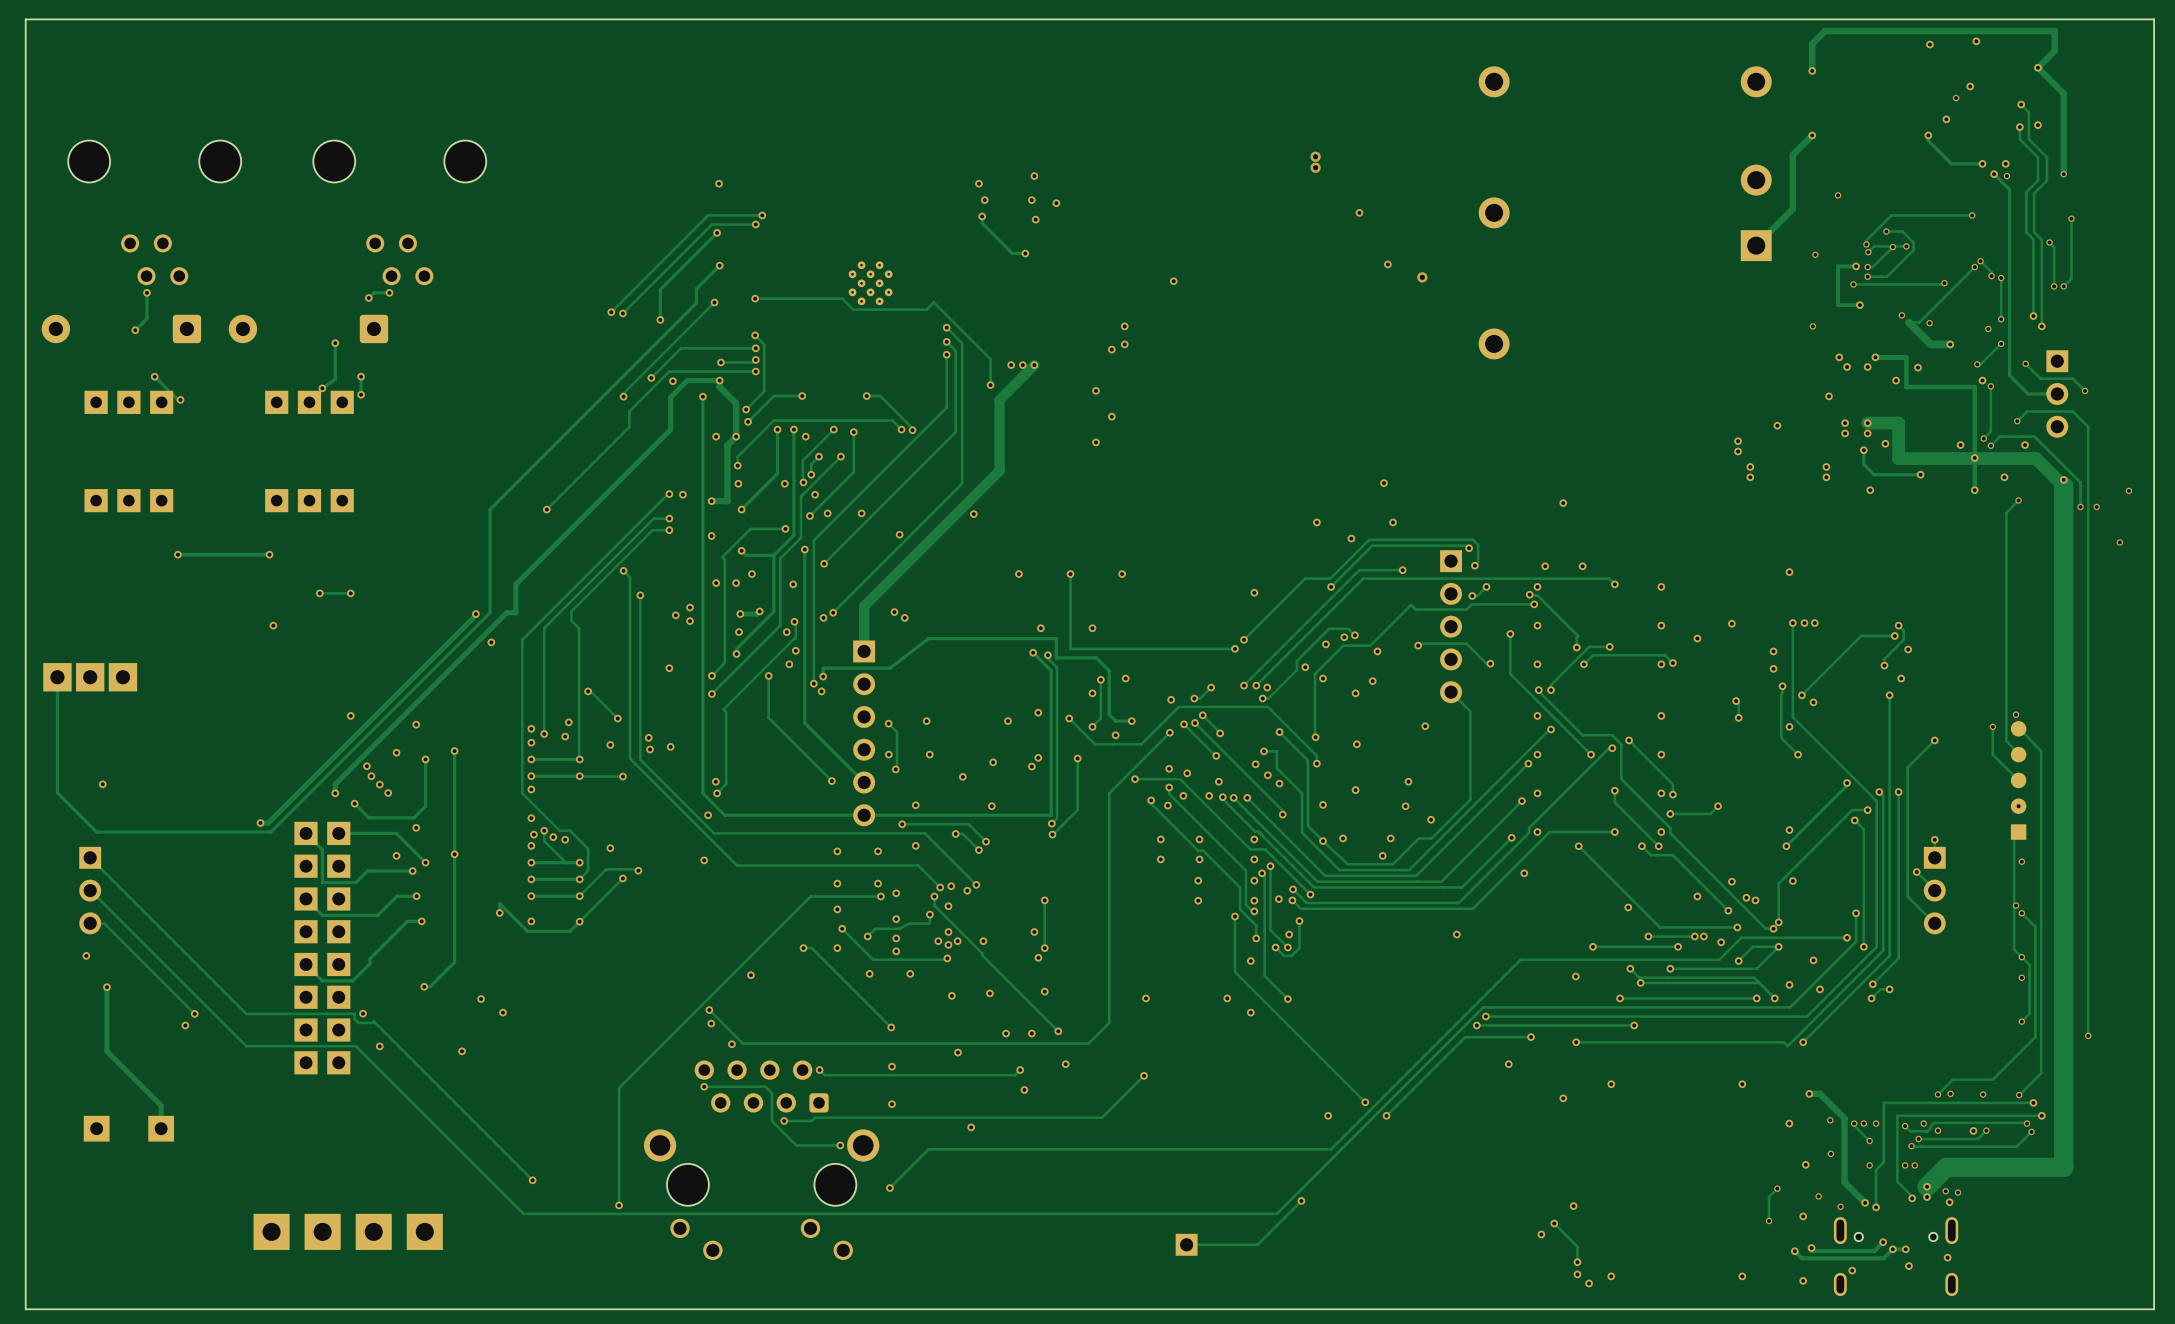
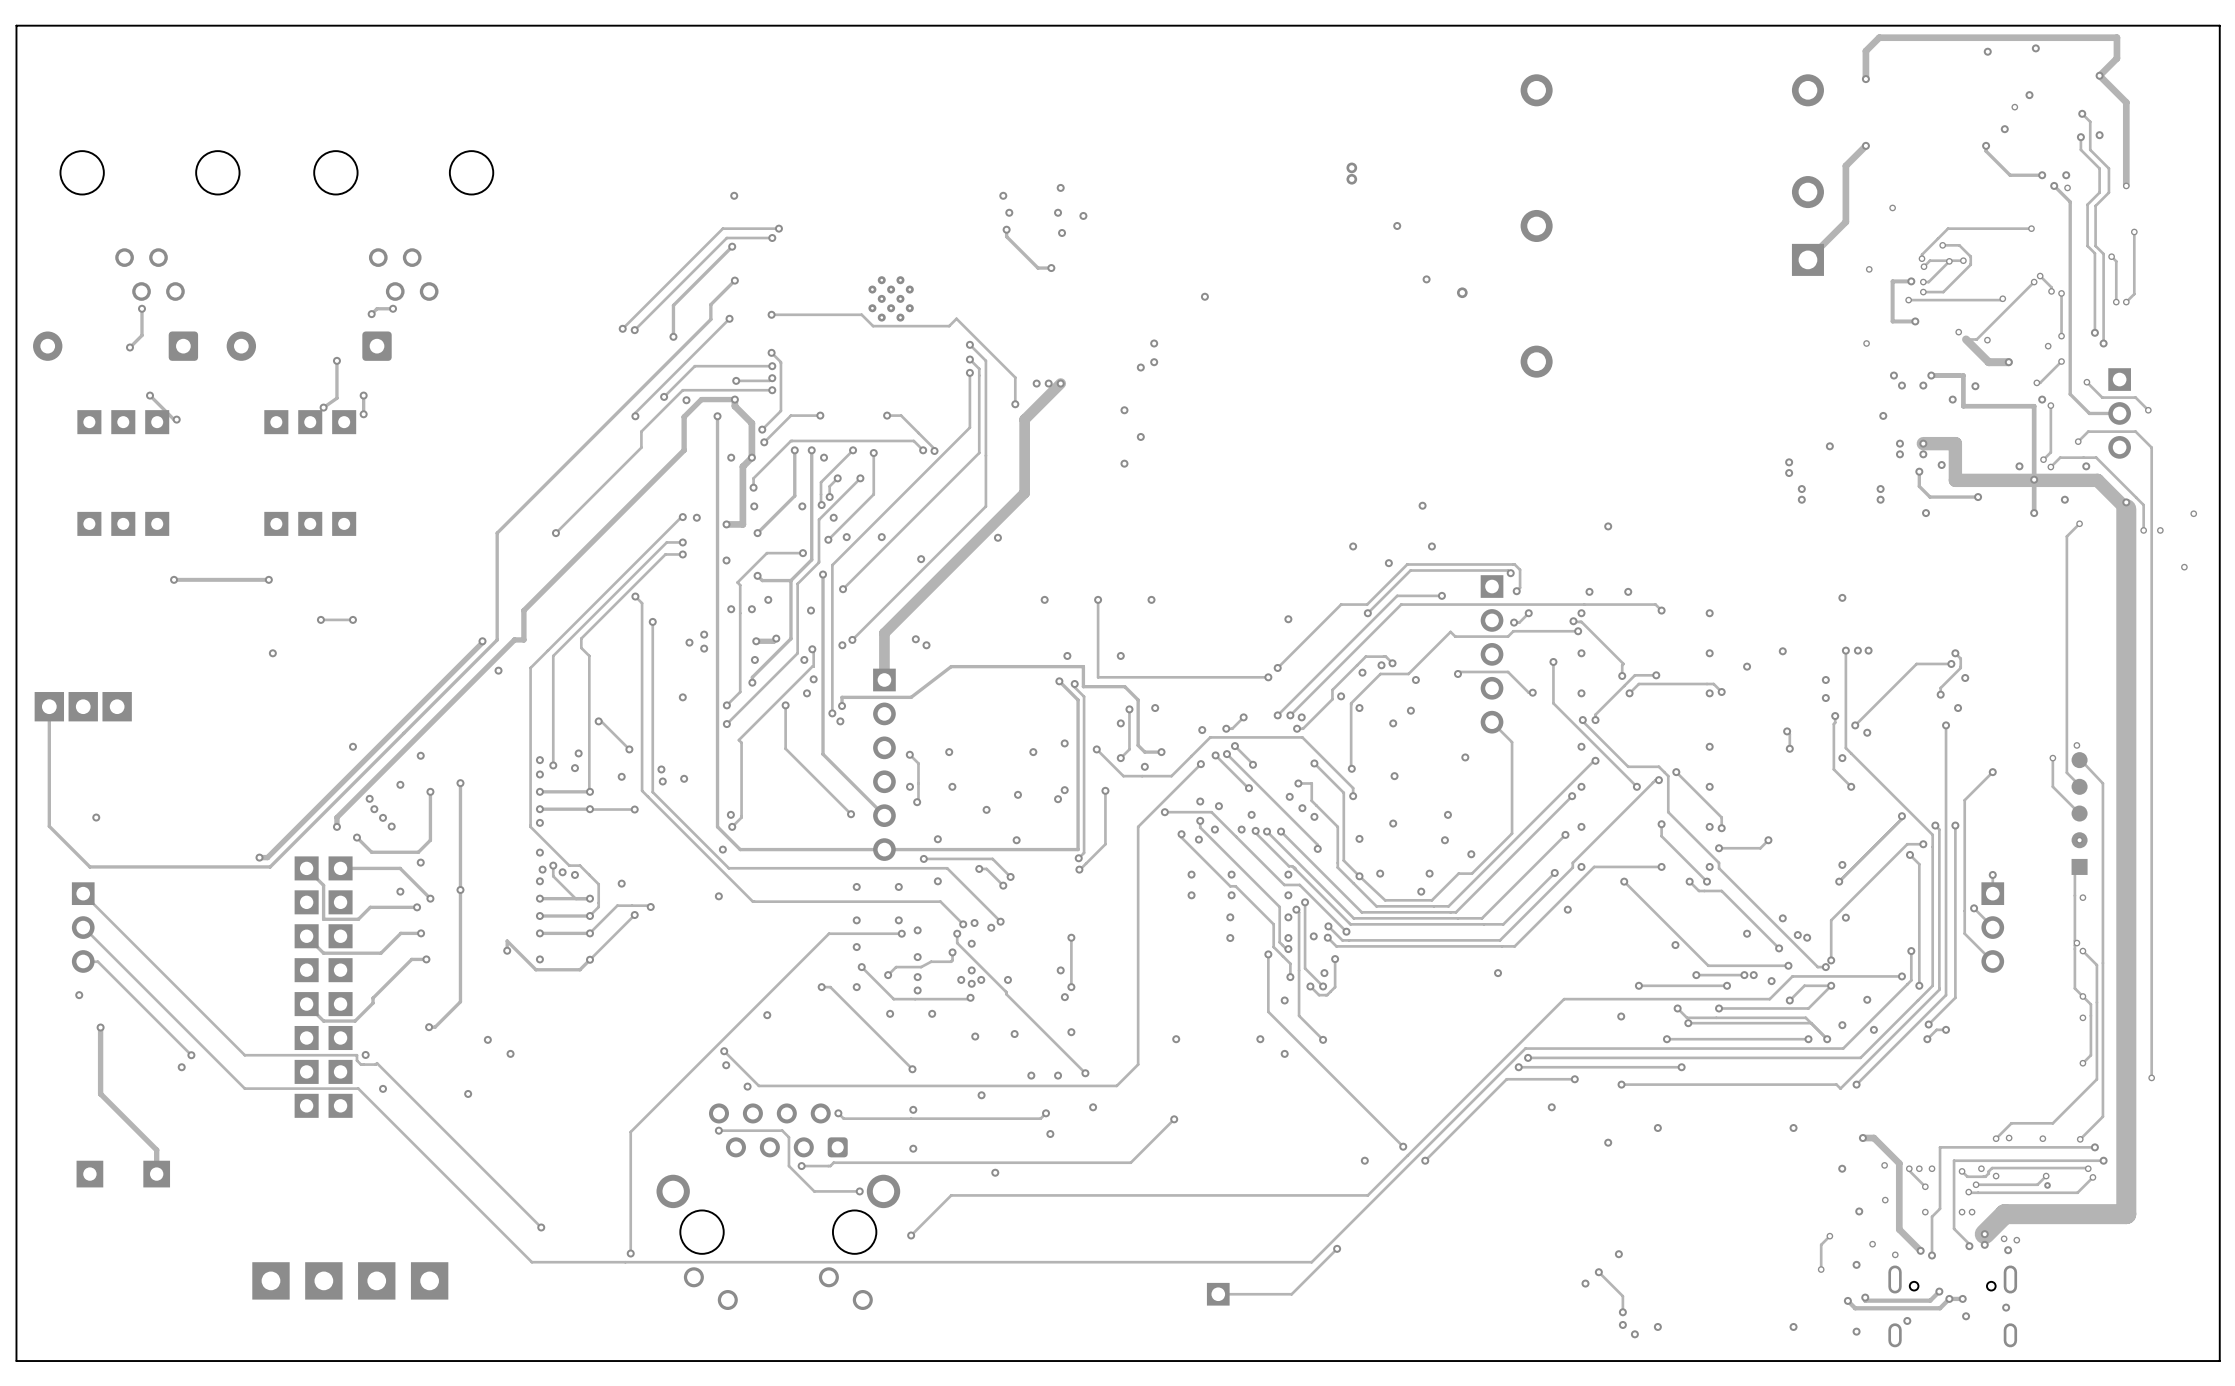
via: (1973, 1130) -> none
via: none -> (2047, 1185)

